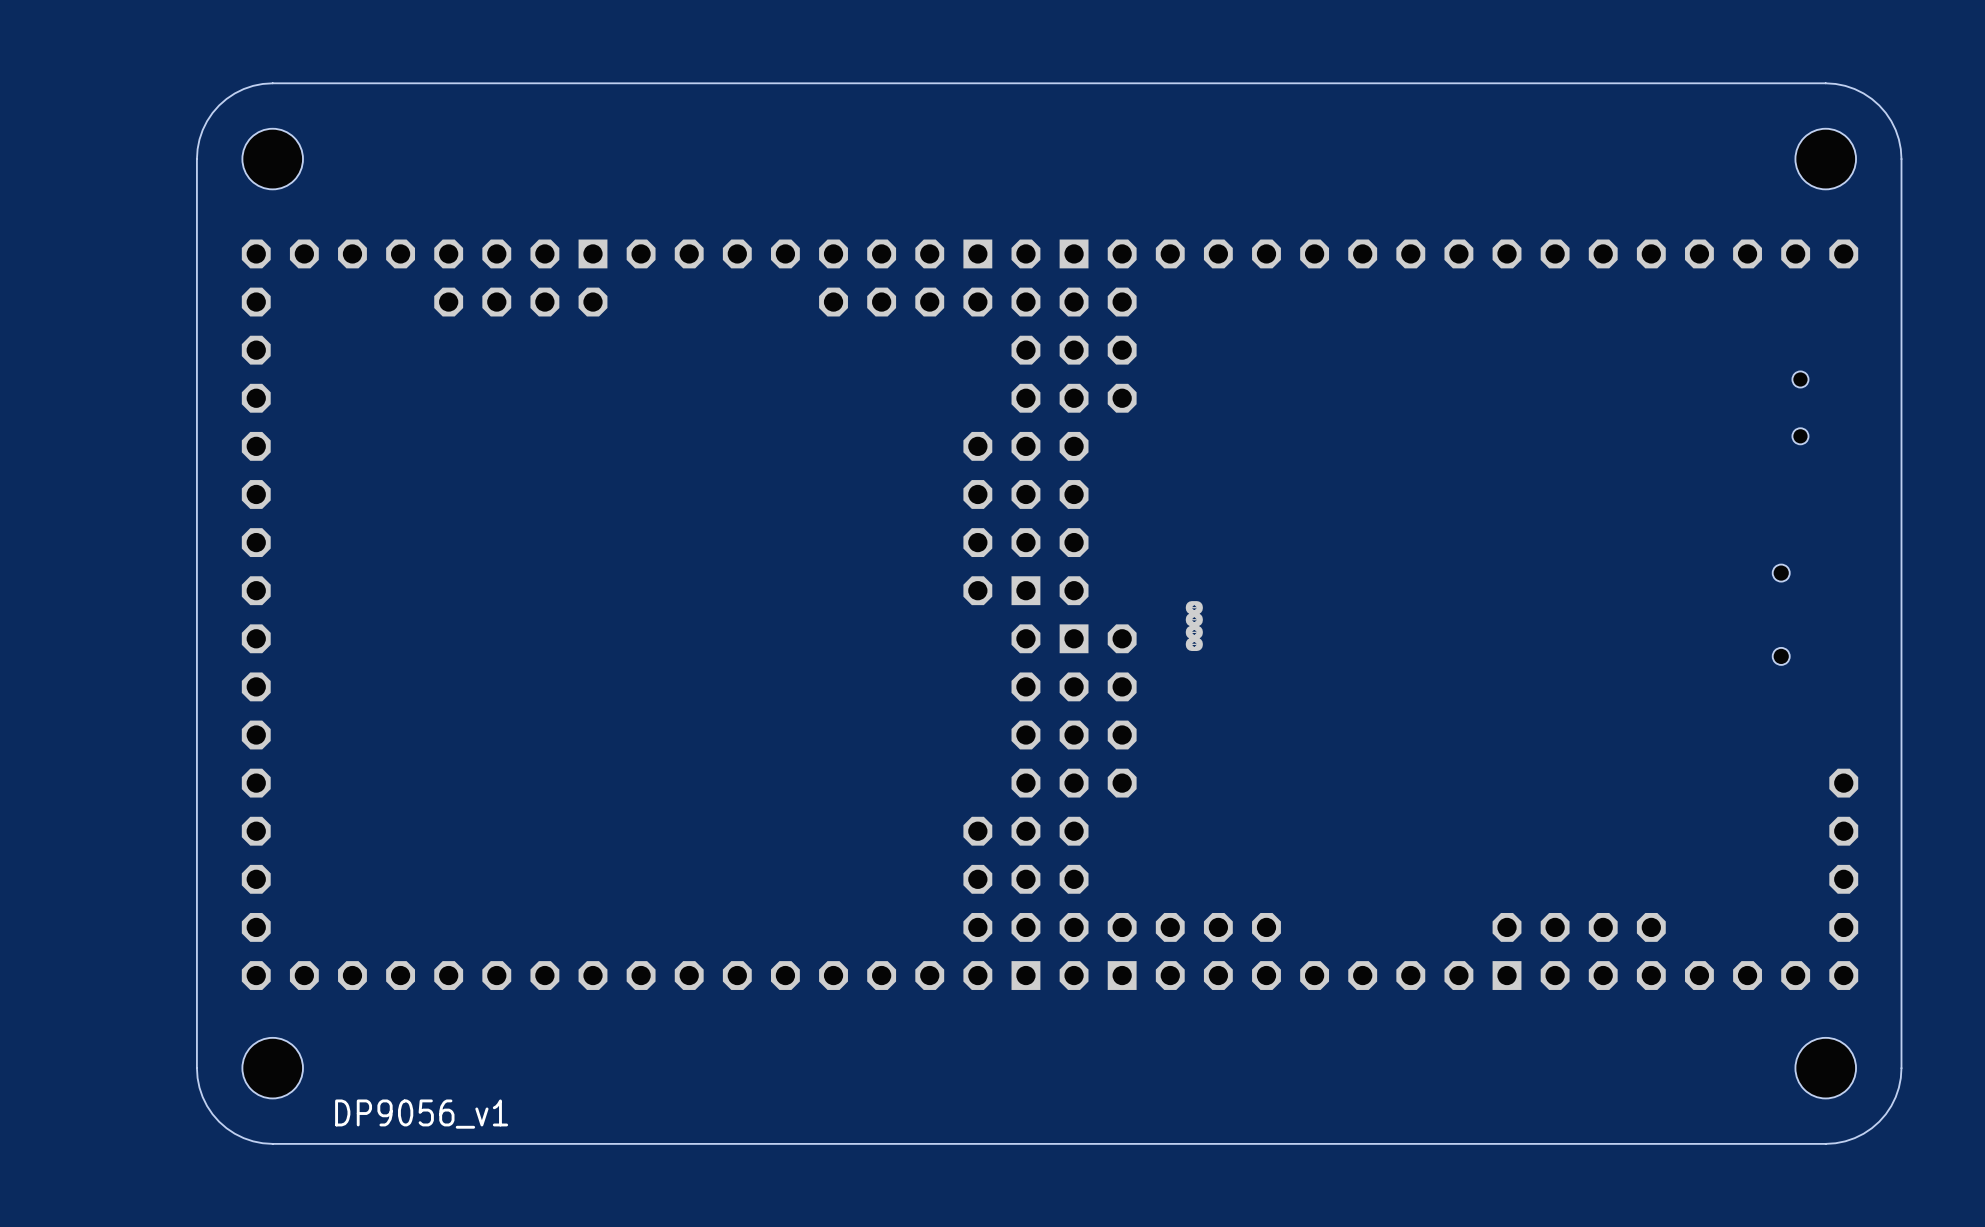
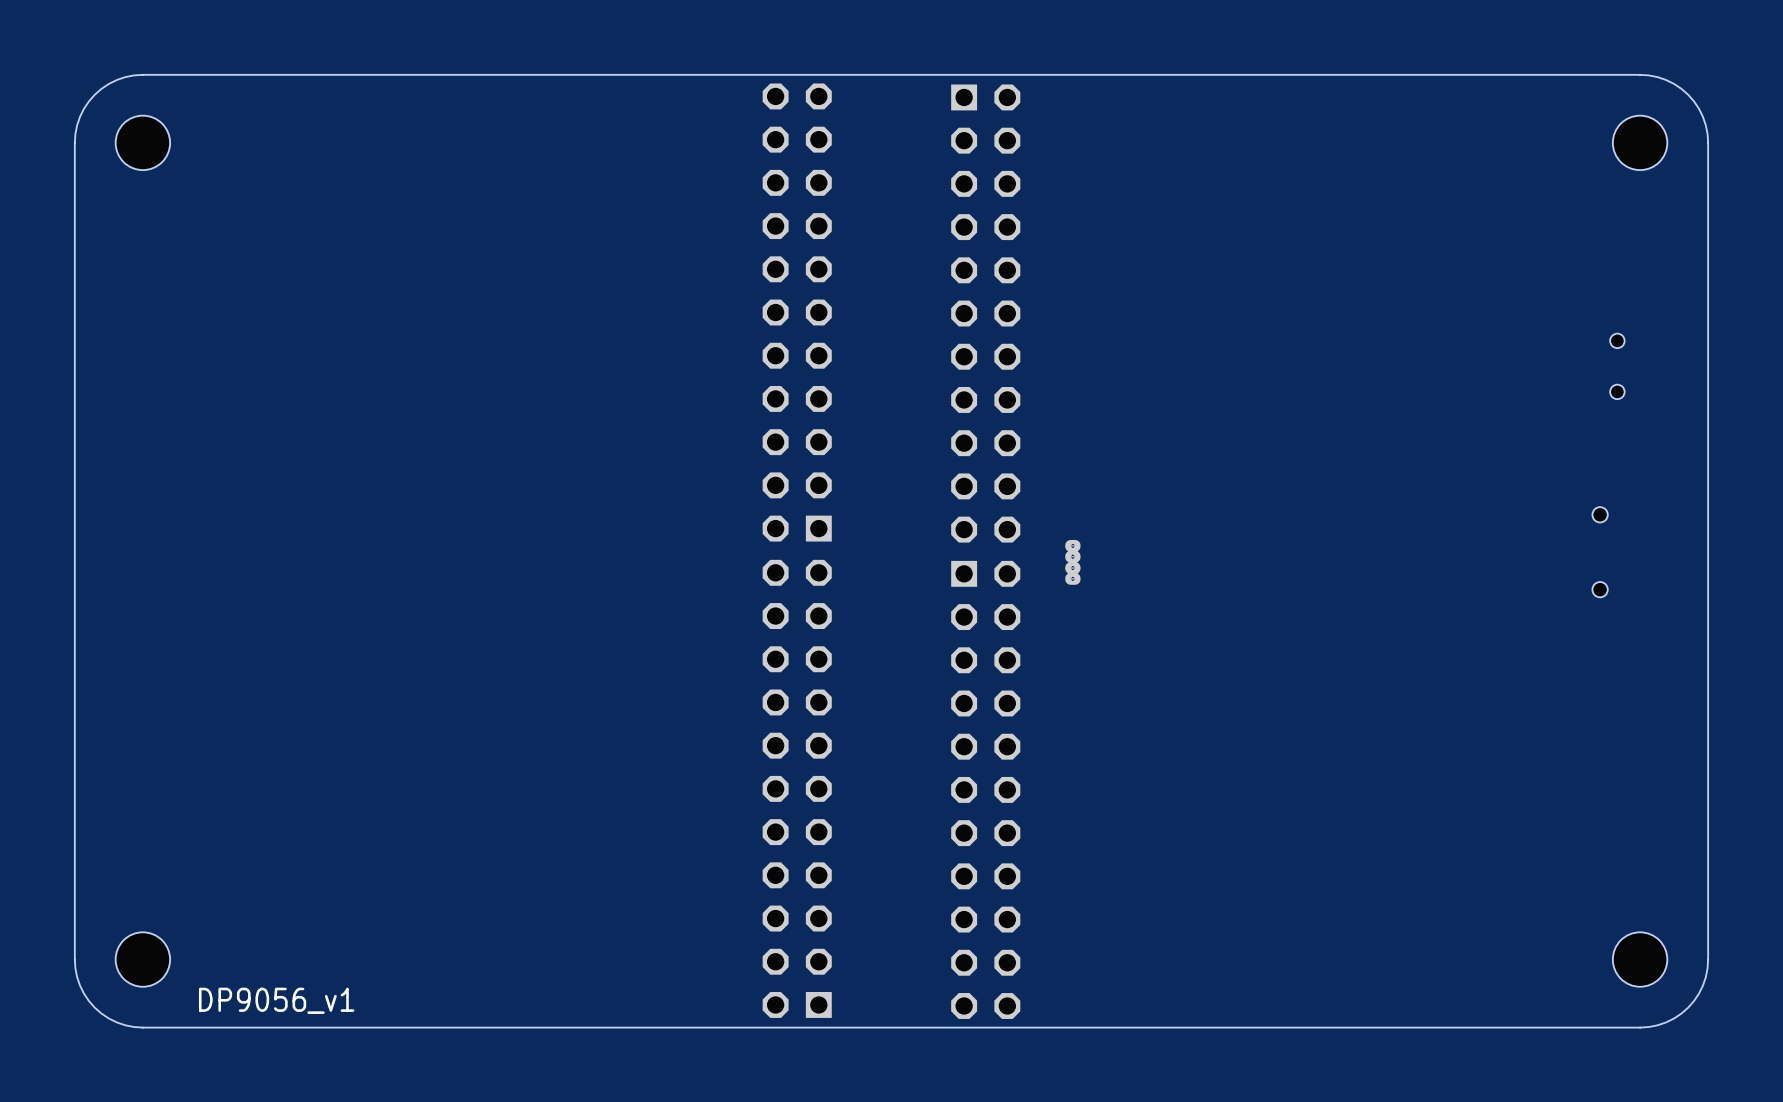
part: (1507, 253) -> none
part: (424, 278) -> none
part: (809, 278) -> none
part: none -> (797, 312)
part: none -> (985, 313)
part: (1001, 422) -> none
part: (1098, 422) -> none
part: none -> (891, 551)
part: (1049, 613) -> none
part: (256, 638) -> none
part: (1001, 807) -> none
part: (1098, 807) -> none
part: (1843, 855) -> none
part: none -> (797, 788)
part: none -> (985, 789)
part: (1290, 951) -> none
part: (1675, 951) -> none
part: (617, 975) -> none

